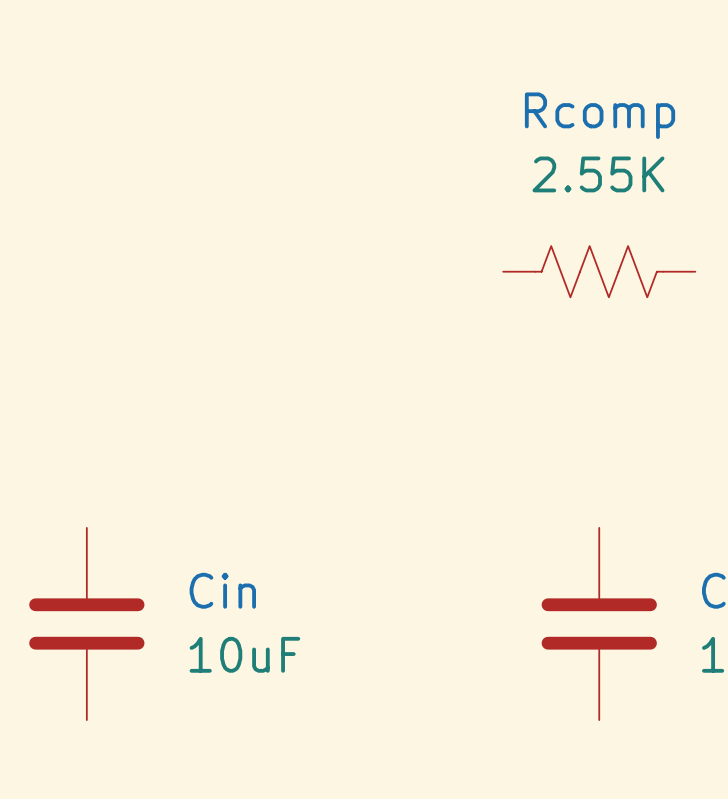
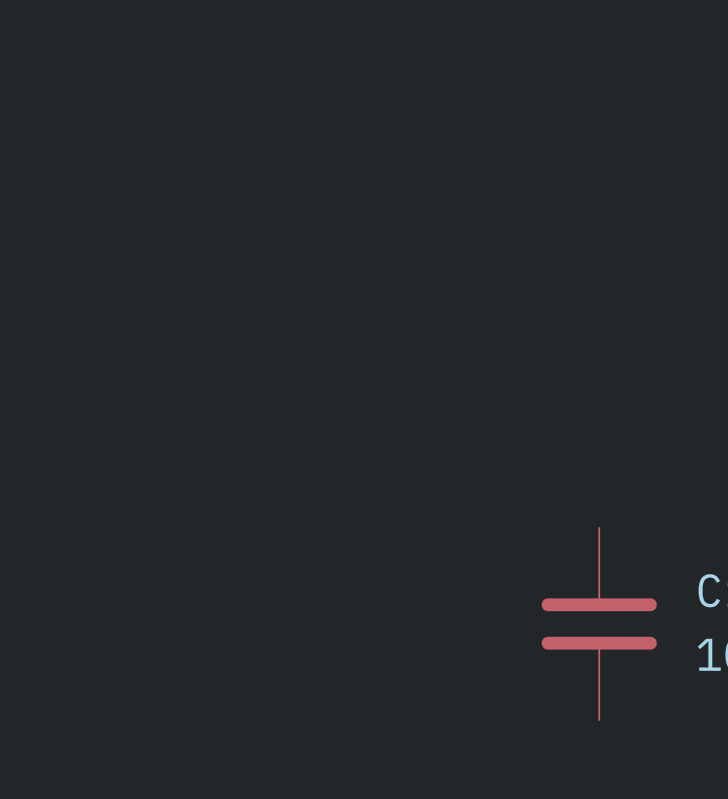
Rcomp: 2.55K (599, 271) -> none
Cin: 10uF (86, 623) -> none

